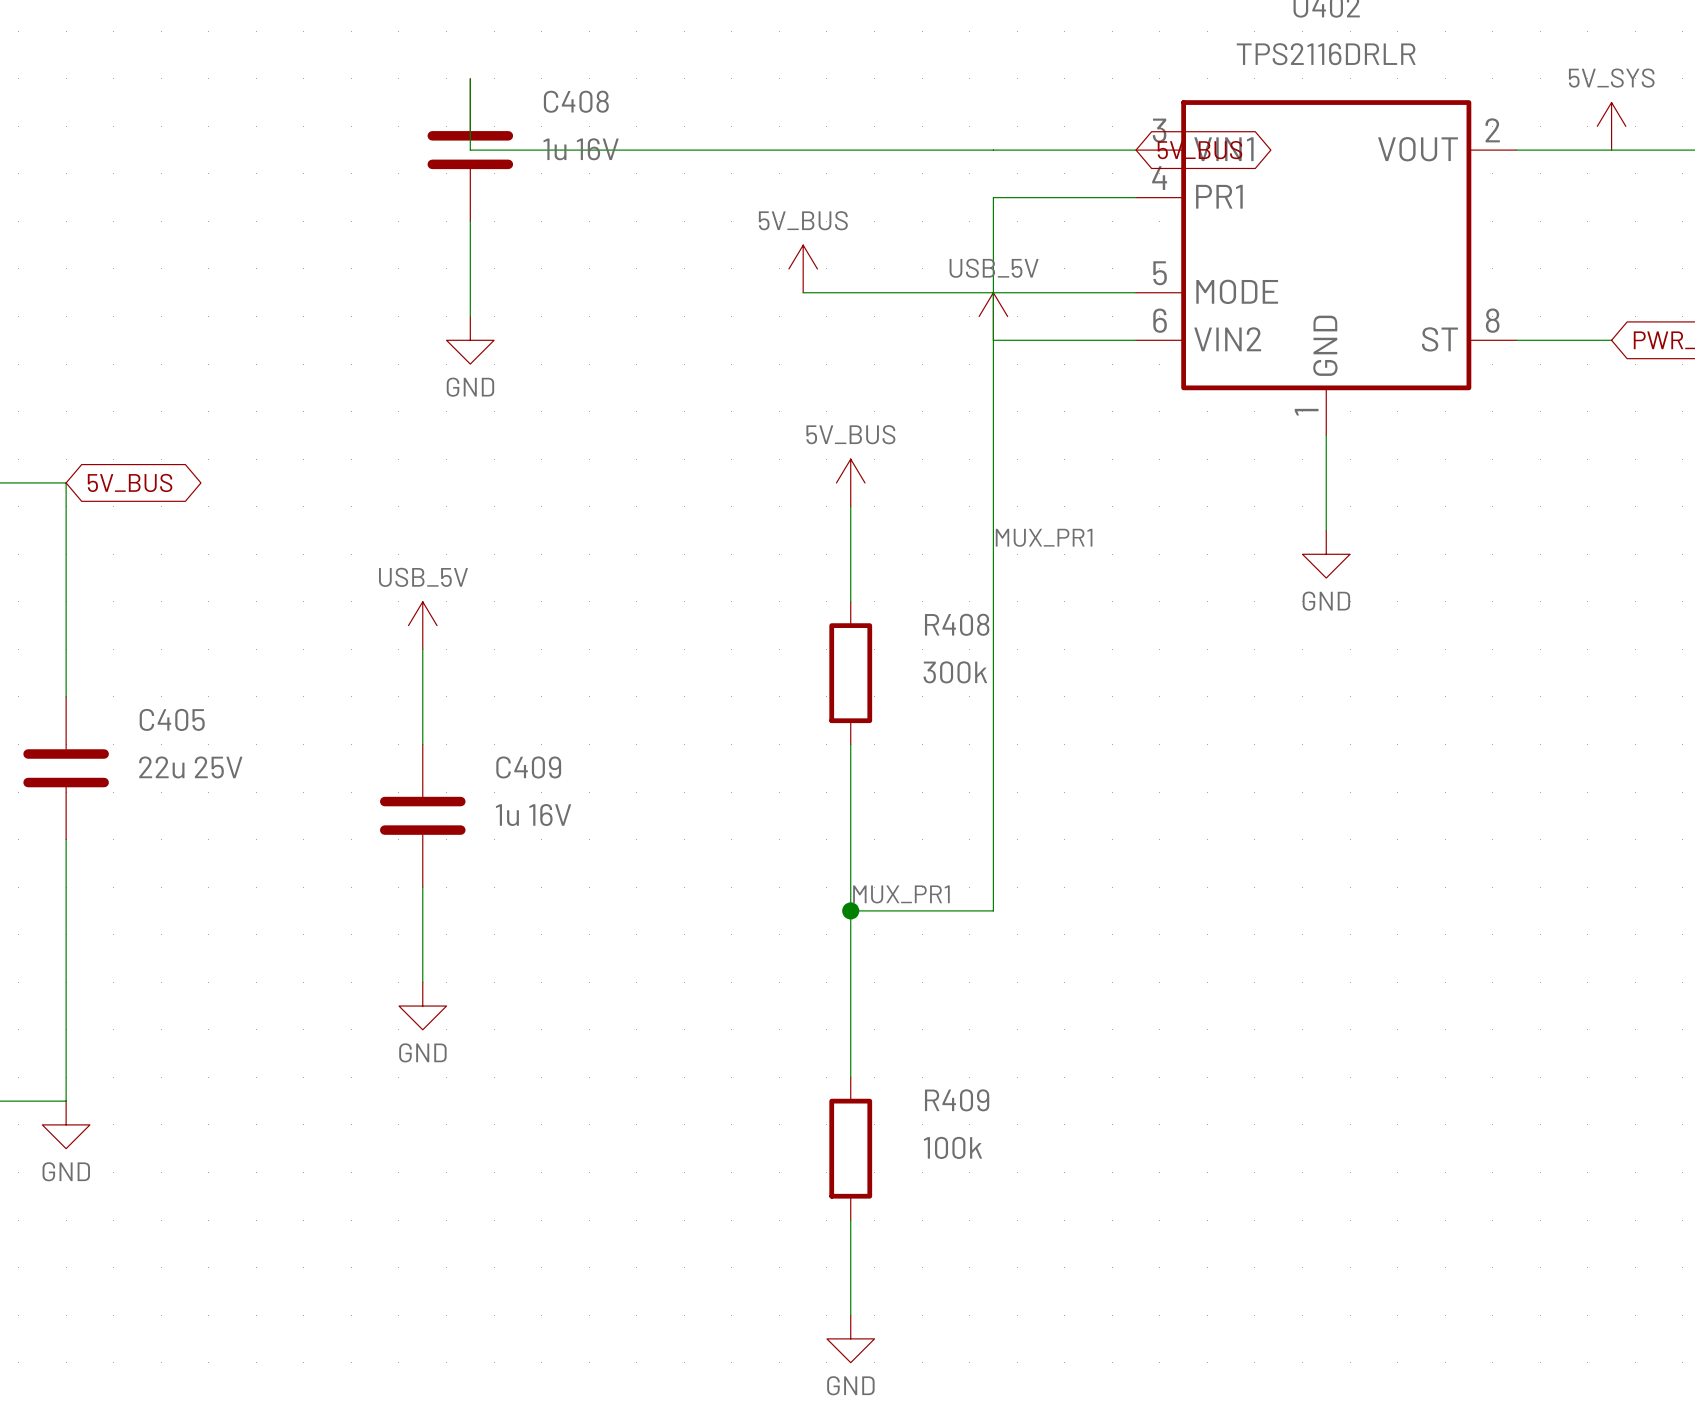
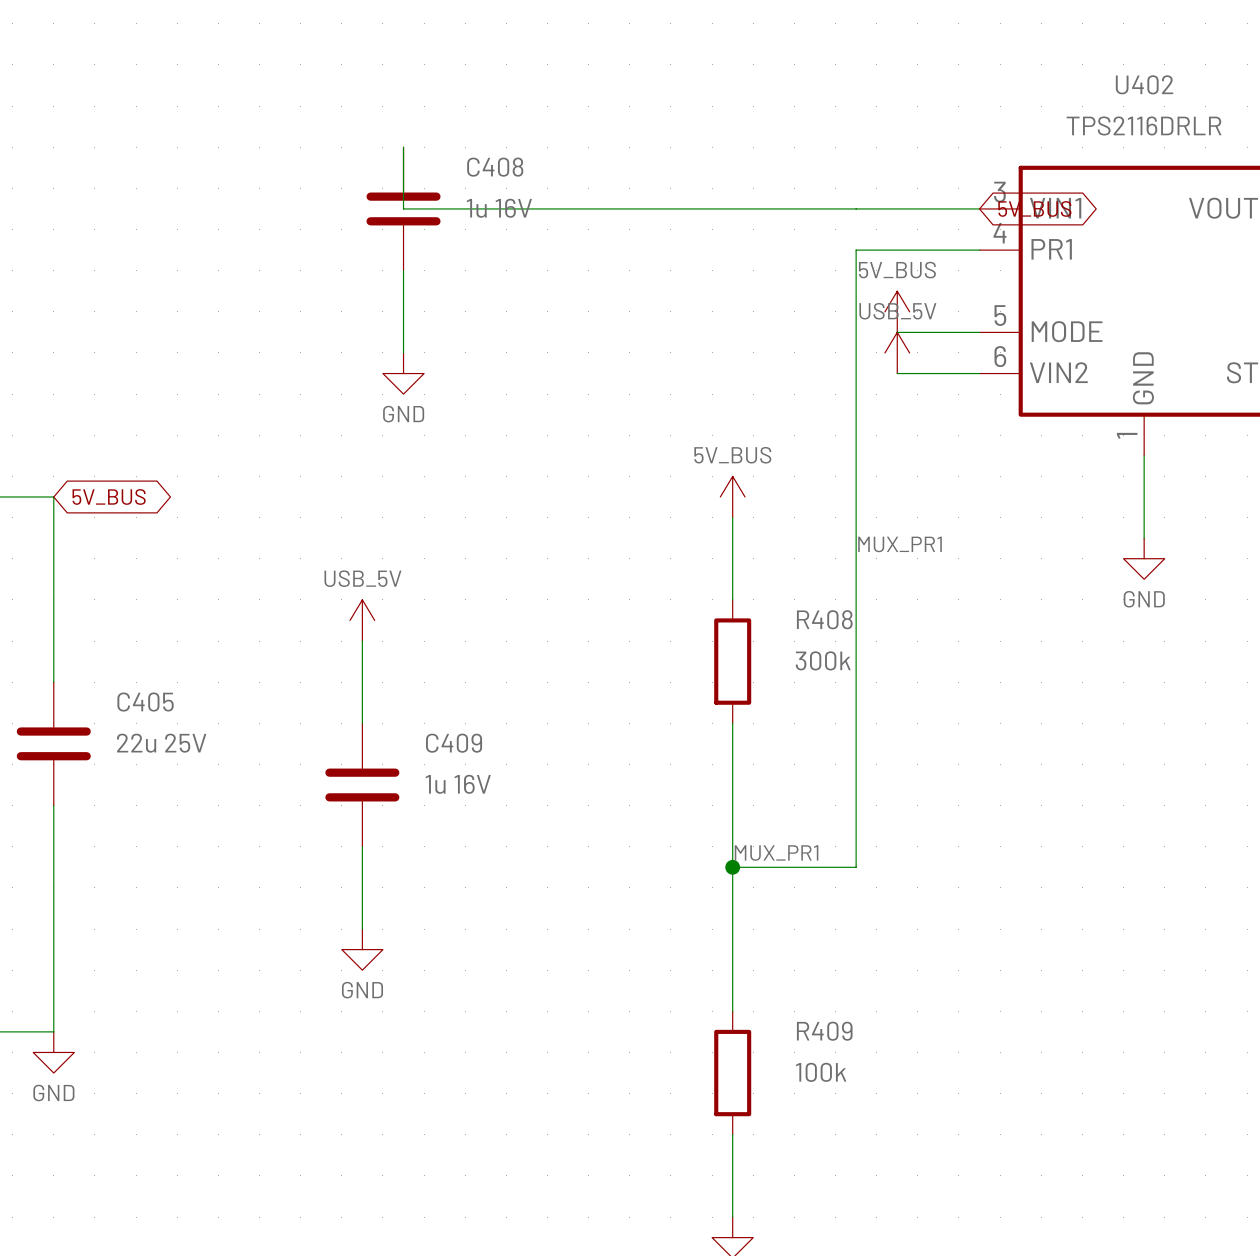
power symbol position: 5V_BUS (803, 268) -> 5V_BUS (897, 311)
wire: (803, 292) (1040, 292) -> none
power symbol position: USB_5V (993, 316) -> USB_5V (897, 352)
wire: (993, 340) (1040, 340) -> none

